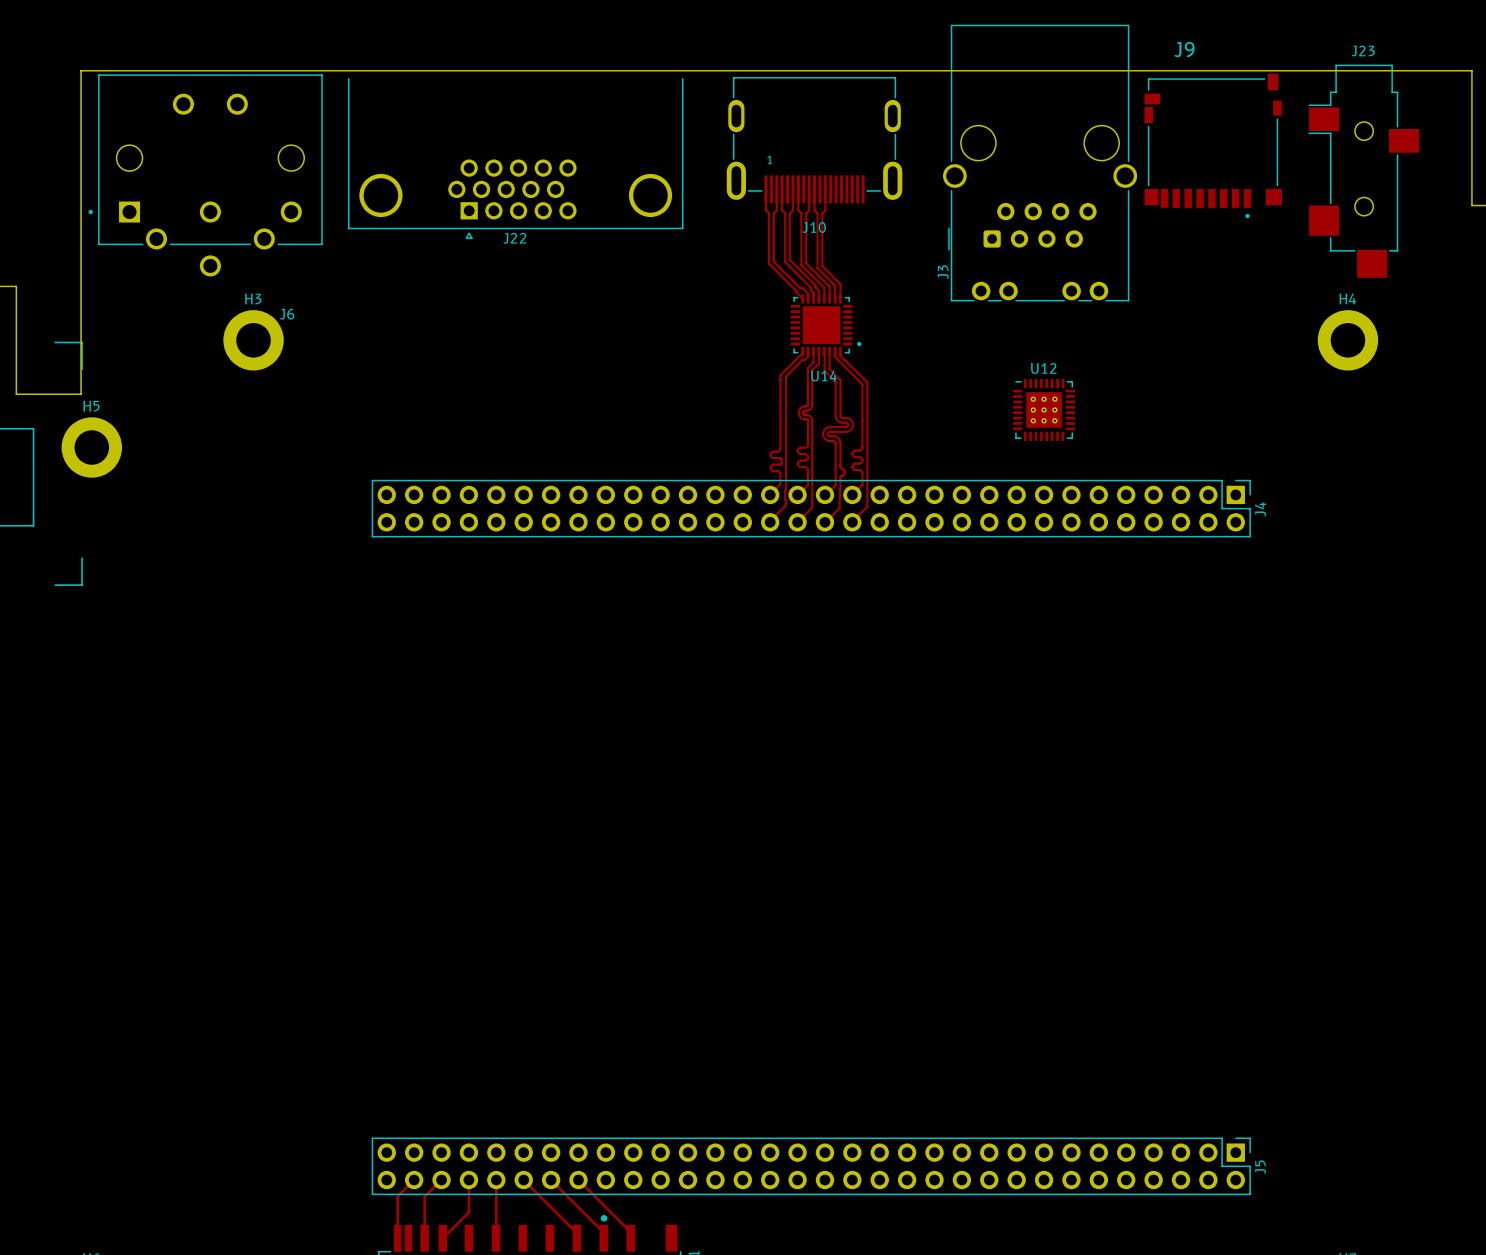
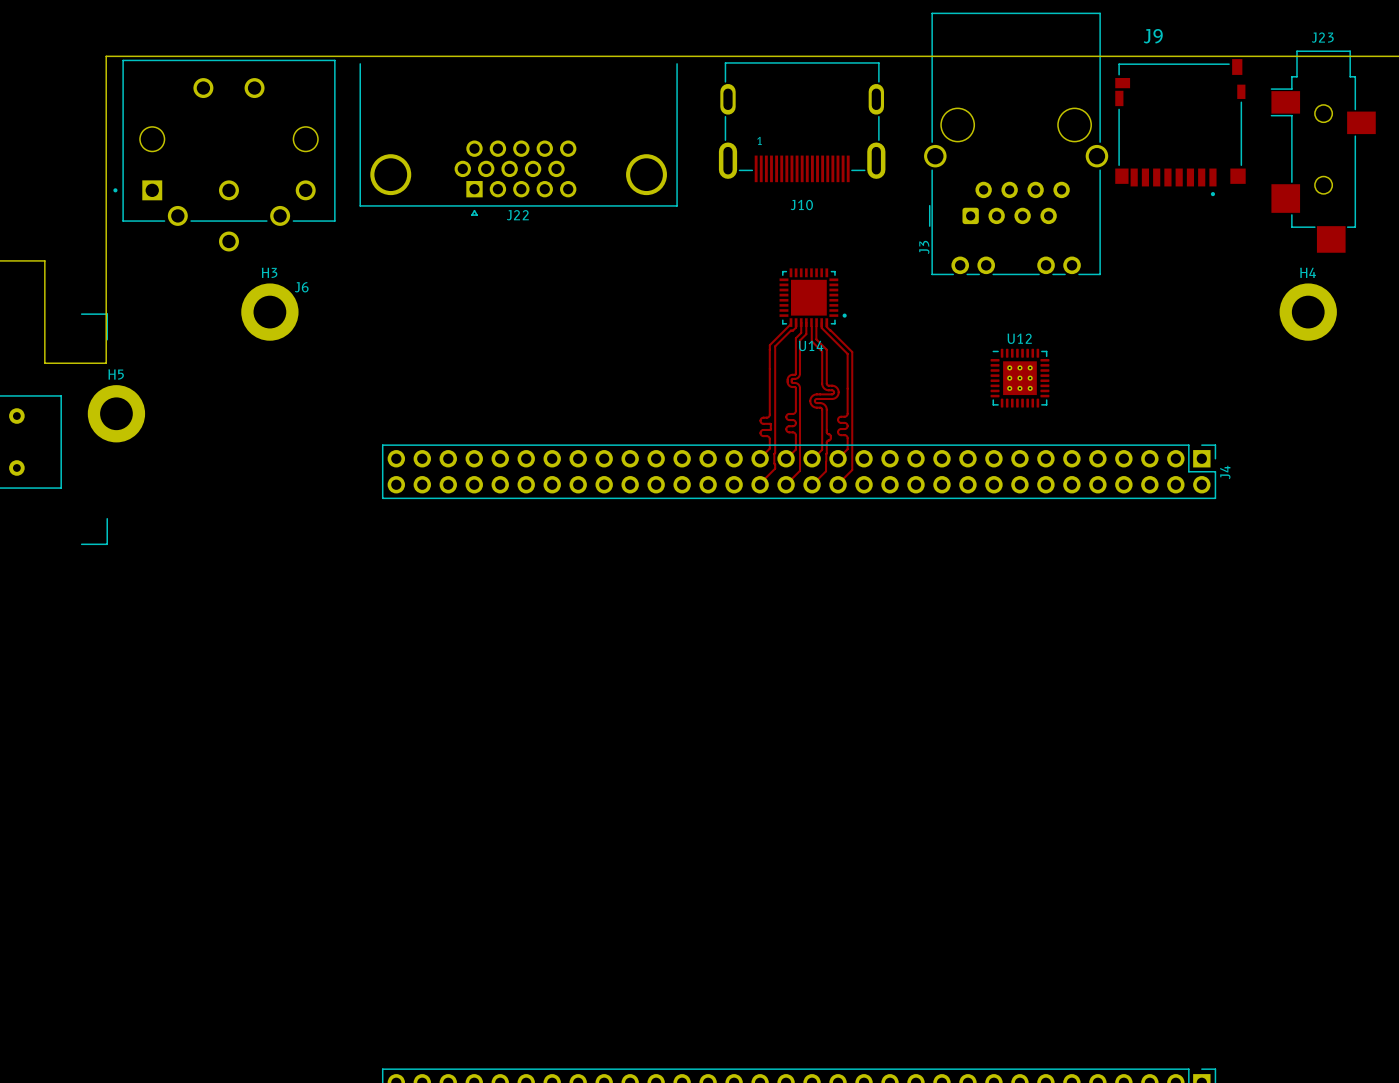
track: (766, 189) (766, 210) (768, 213) (768, 263) (802, 298) -> none
track: (776, 189) (776, 210) (773, 213) (773, 261) (808, 293) (808, 298) -> none
track: (782, 189) (782, 210) (785, 213) (785, 262) (811, 287) (813, 298) -> none
track: (792, 189) (792, 210) (790, 213) (790, 259) (815, 285) (818, 290) (818, 298) -> none
track: (798, 189) (798, 210) (801, 213) (801, 264) (824, 287) (824, 298) -> none
track: (809, 189) (809, 210) (806, 213) (806, 263) (823, 280) -> none
track: (814, 189) (814, 210) (817, 213) (817, 268) (835, 286) (835, 298) -> none
track: (825, 189) (825, 210) (822, 213) (822, 266) (837, 280) -> none
track: (823, 280) (829, 286) (829, 298) -> none
track: (837, 280) (840, 284) (840, 298) -> none

